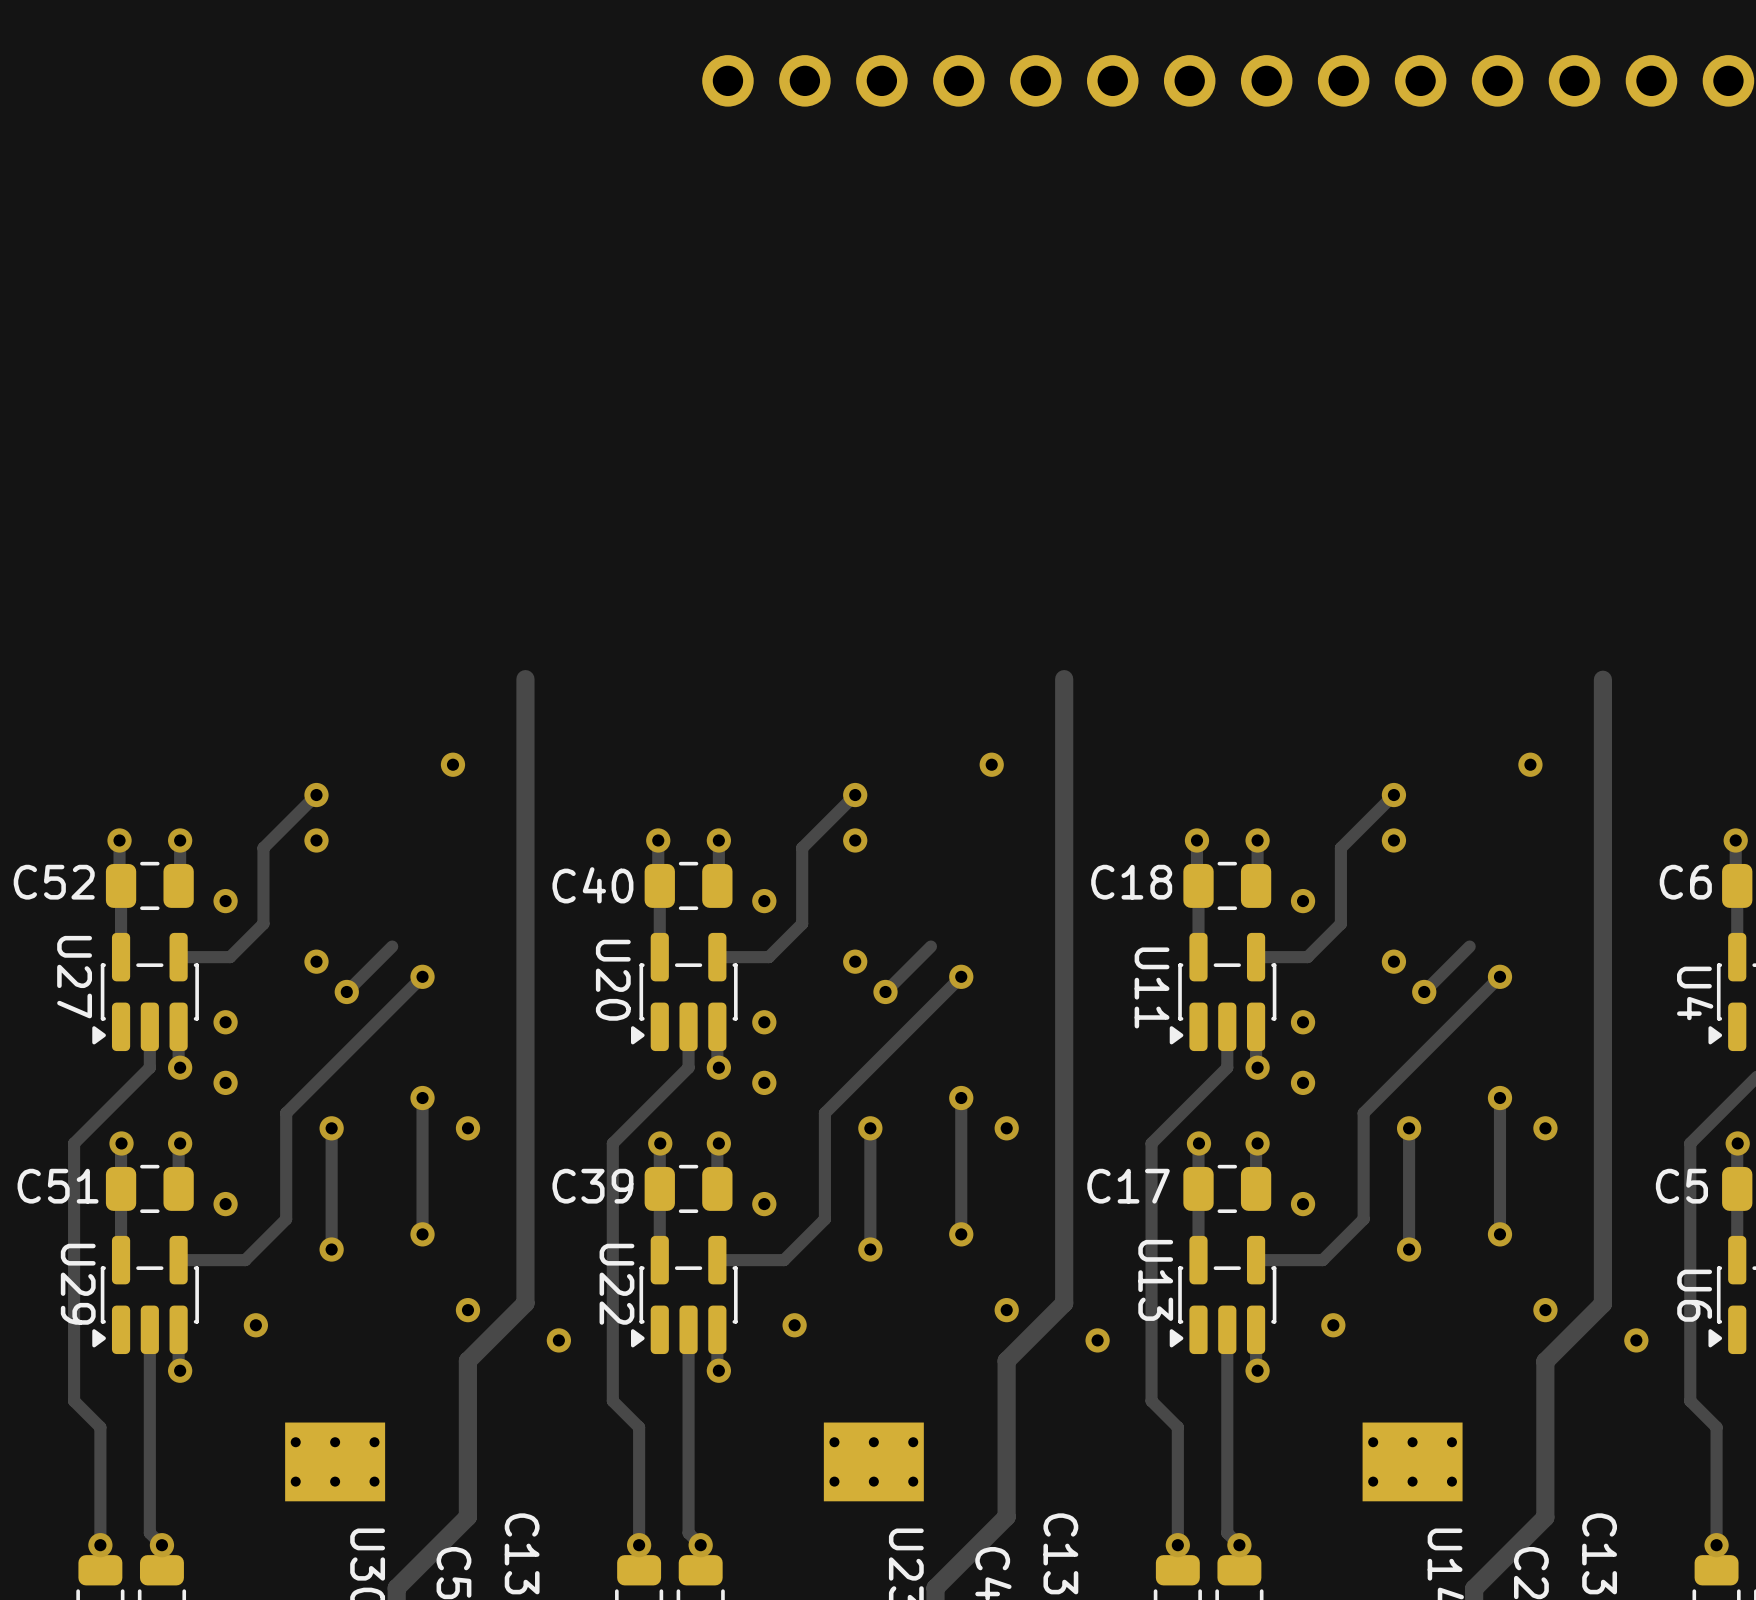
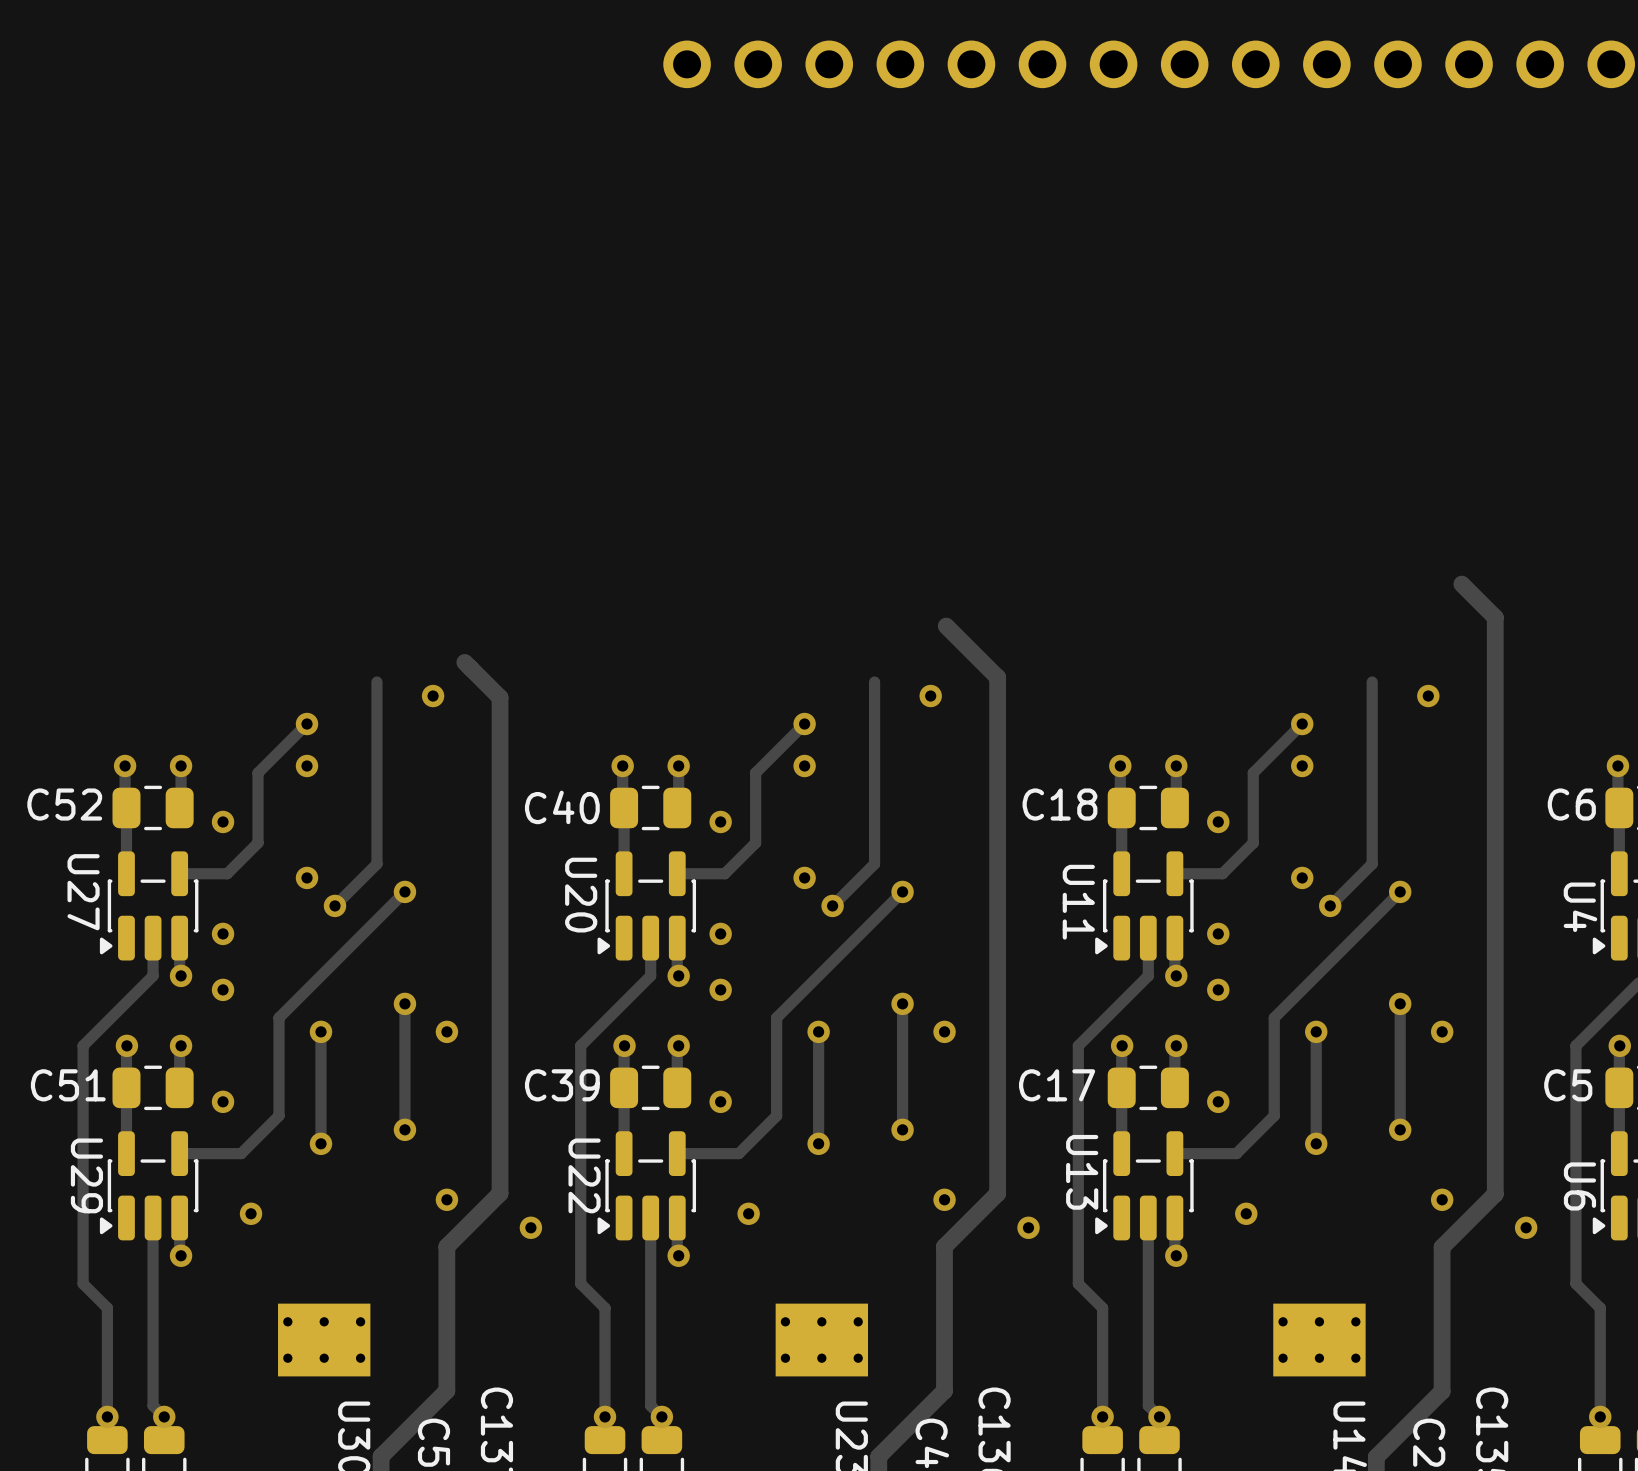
track: none -> (1461, 584) (1495, 617)
track: (525, 679) (525, 766) -> (464, 662) (500, 697)
track: (1064, 679) (1064, 744) -> (946, 626) (997, 677)
track: none -> (376, 682) (376, 863)
track: none -> (874, 682) (874, 863)
track: none -> (1372, 682) (1372, 863)

